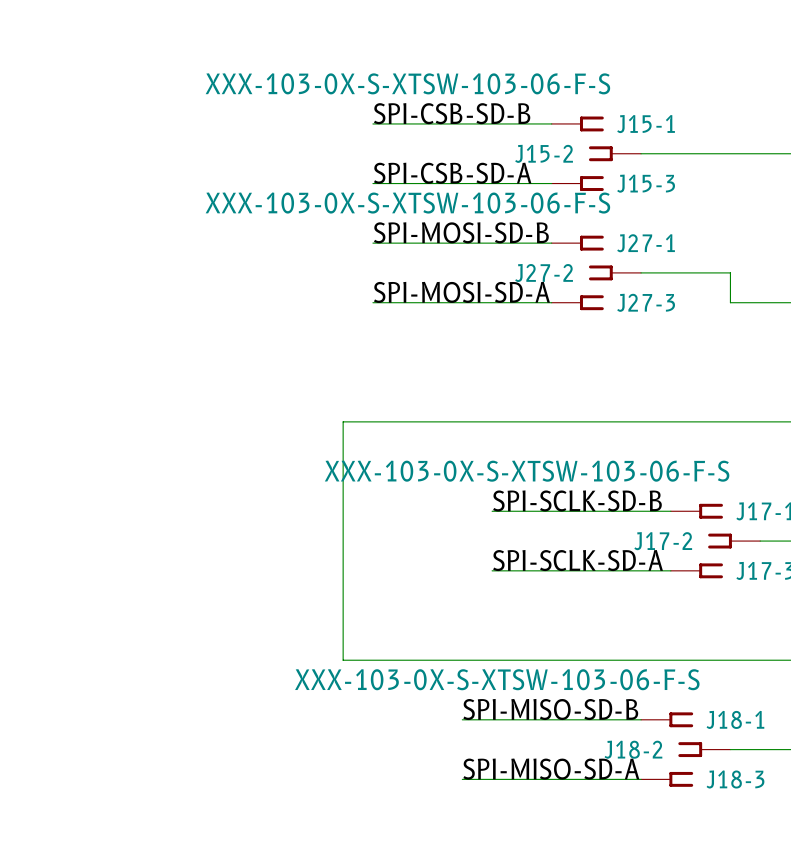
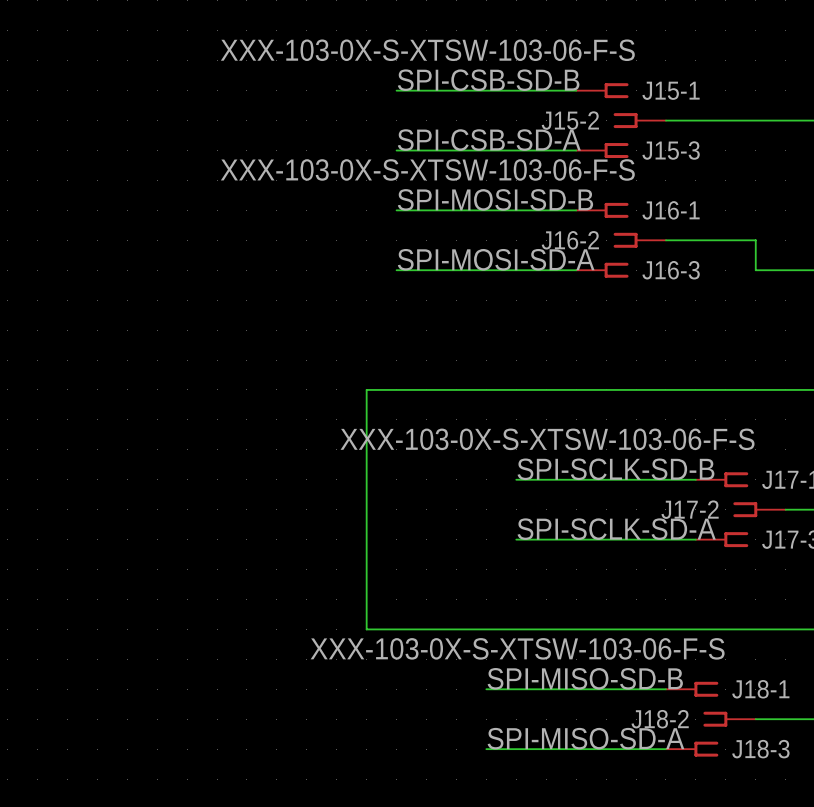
J27-1 name: J27-1 (646, 243) -> J16-1 (671, 210)
J27-2 name: J27-2 (544, 273) -> J16-2 (570, 240)
J27-3 name: J27-3 (646, 302) -> J16-3 (671, 270)

